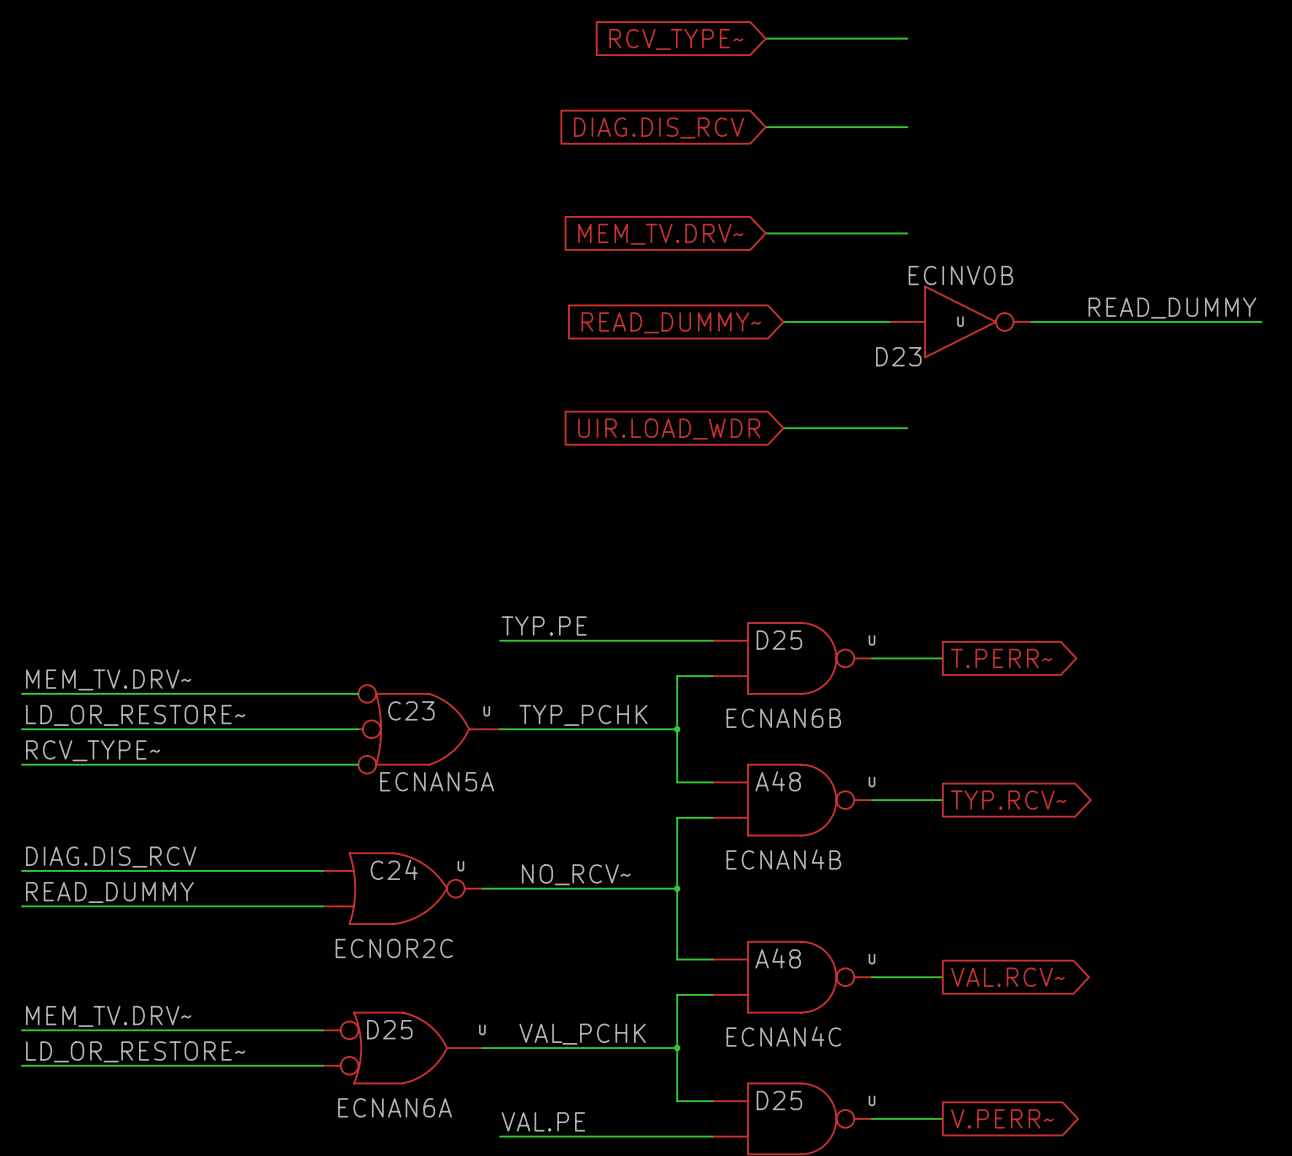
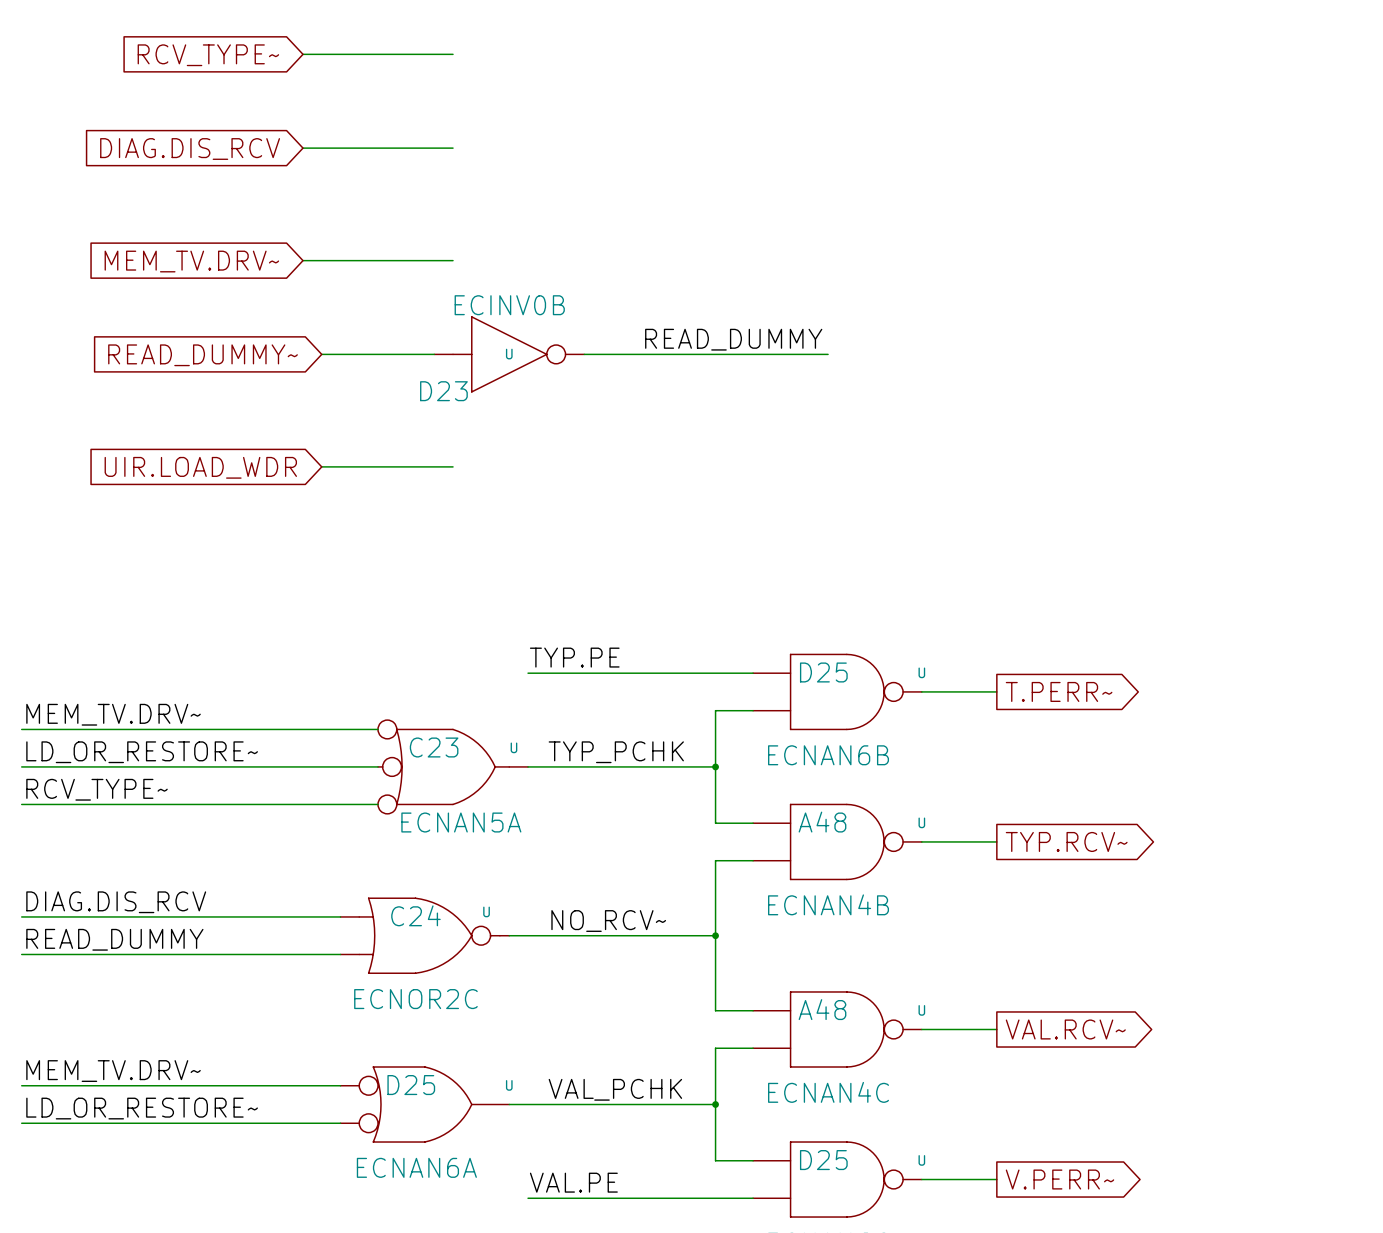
wire: (765, 38) (907, 38) -> none
global label: RCV_TYPE~ (676, 39) -> none
wire: none -> (303, 54) (453, 54)
global label: none -> RCV_TYPE~ (208, 55)
wire: (765, 127) (907, 127) -> none
global label: DIAG.DIS_RCV (659, 128) -> none
wire: none -> (303, 148) (453, 148)
global label: none -> DIAG.DIS_RCV (190, 149)
wire: (765, 233) (907, 233) -> none
global label: MEM_TV.DRV~ (660, 234) -> none
global label: none -> MEM_TV.DRV~ (191, 261)
wire: none -> (303, 260) (453, 260)
label: READ_DUMMY (1172, 308) -> none
wire: (783, 321) (889, 321) -> none
U: (960, 321) -> none
wire: (1031, 321) (1261, 321) -> none
global label: READ_DUMMY~ (671, 322) -> none
label: none -> READ_DUMMY (733, 339)
wire: none -> (321, 354) (434, 354)
U: none -> (509, 354)
wire: none -> (584, 354) (828, 354)
global label: none -> READ_DUMMY~ (203, 355)
wire: (783, 428) (907, 428) -> none
global label: UIR.LOAD_WDR (669, 429) -> none
wire: none -> (321, 466) (453, 466)
global label: none -> UIR.LOAD_WDR (200, 467)

